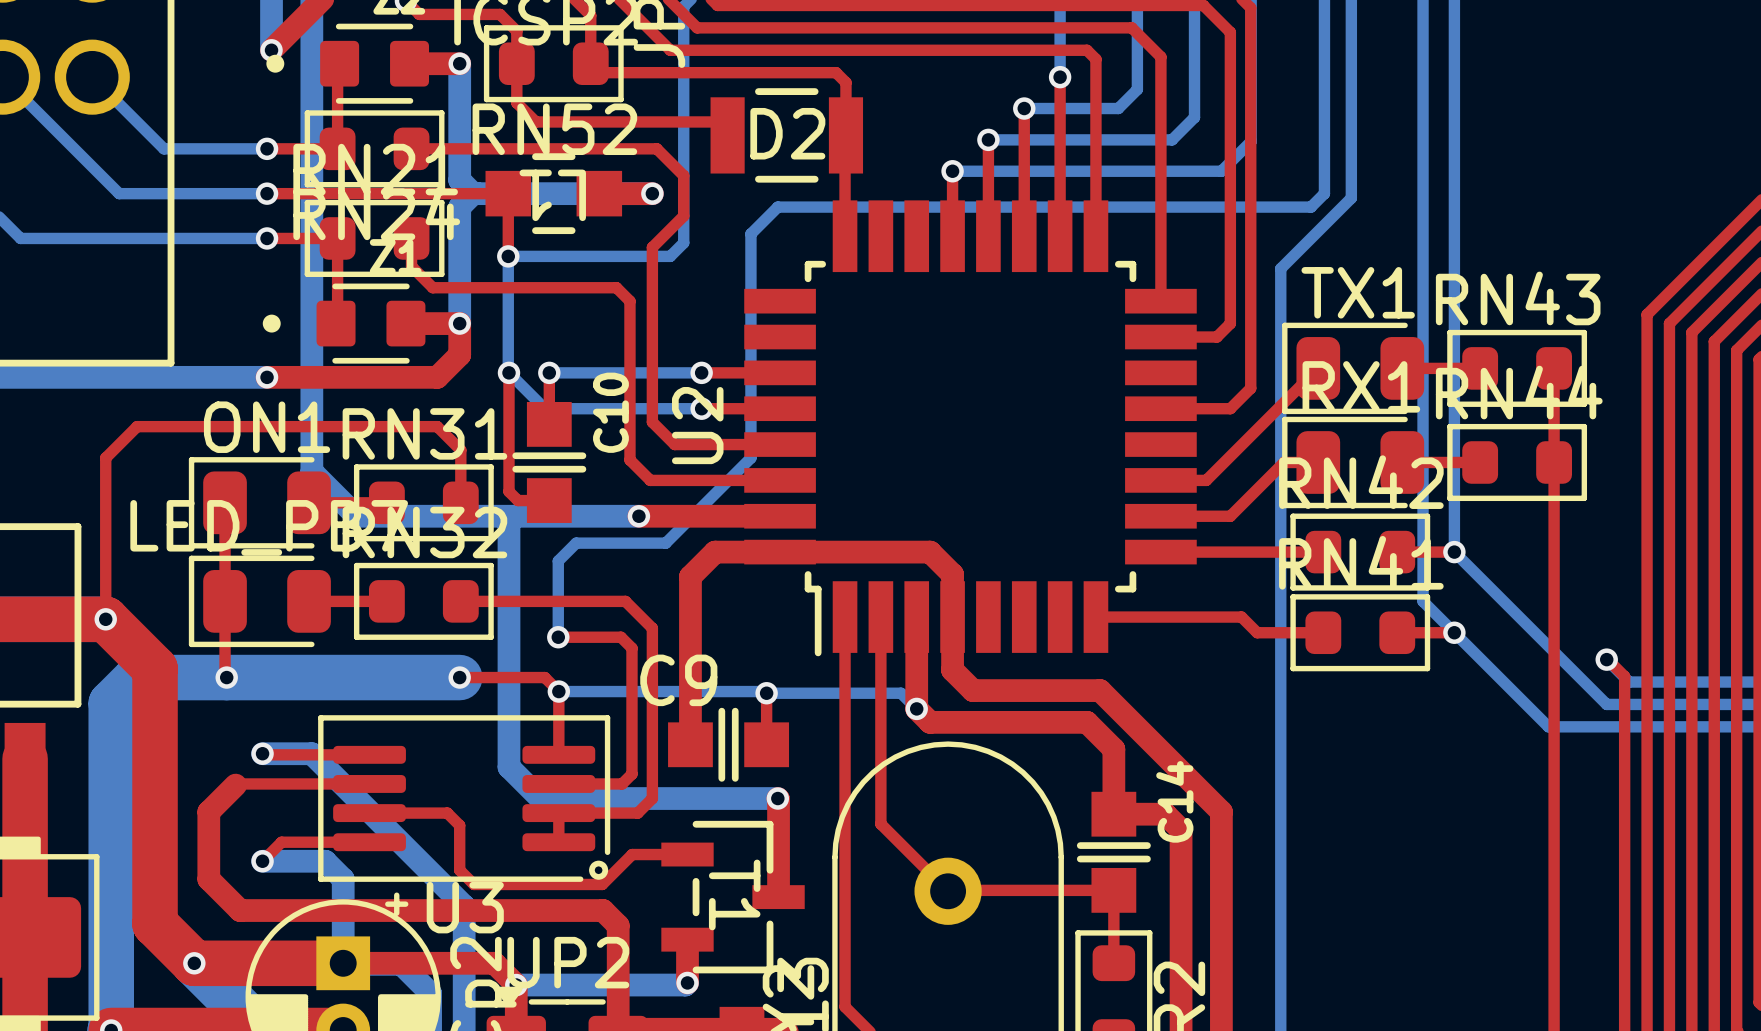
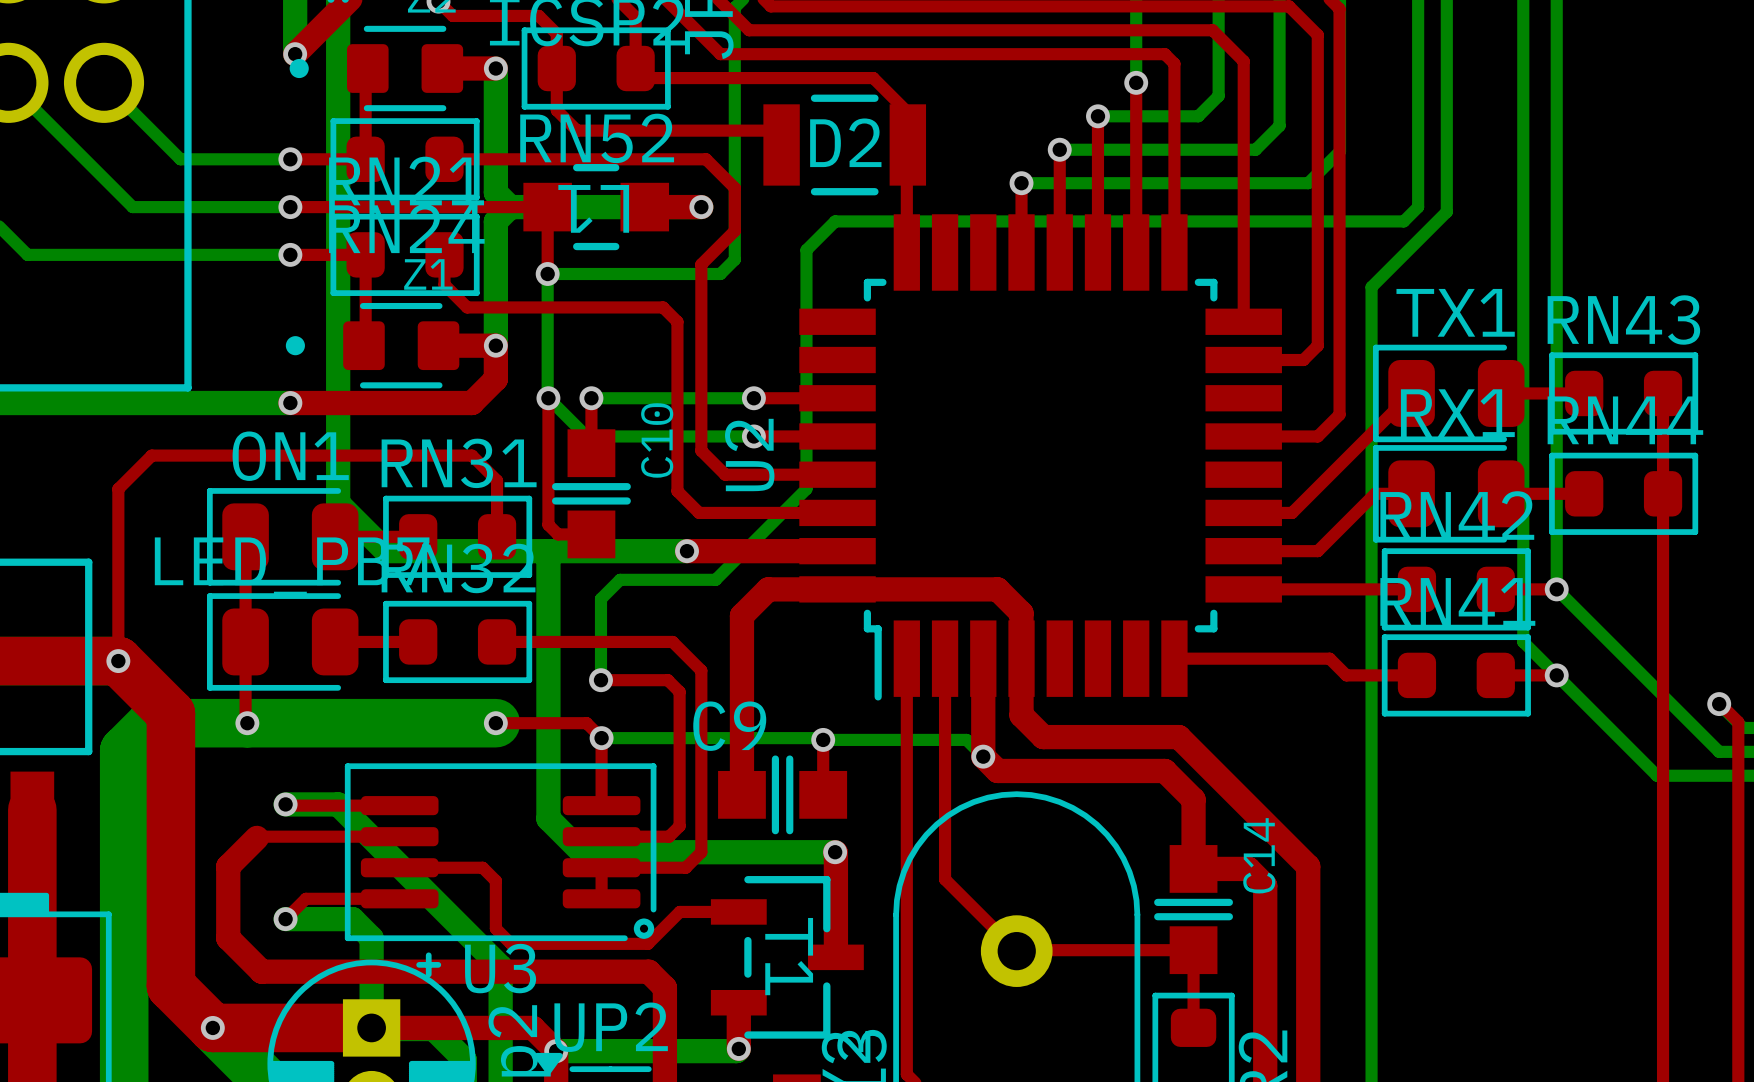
top track: (813, 72) (836, 72) (845, 82) (845, 104) -> (873, 78) (907, 112)

